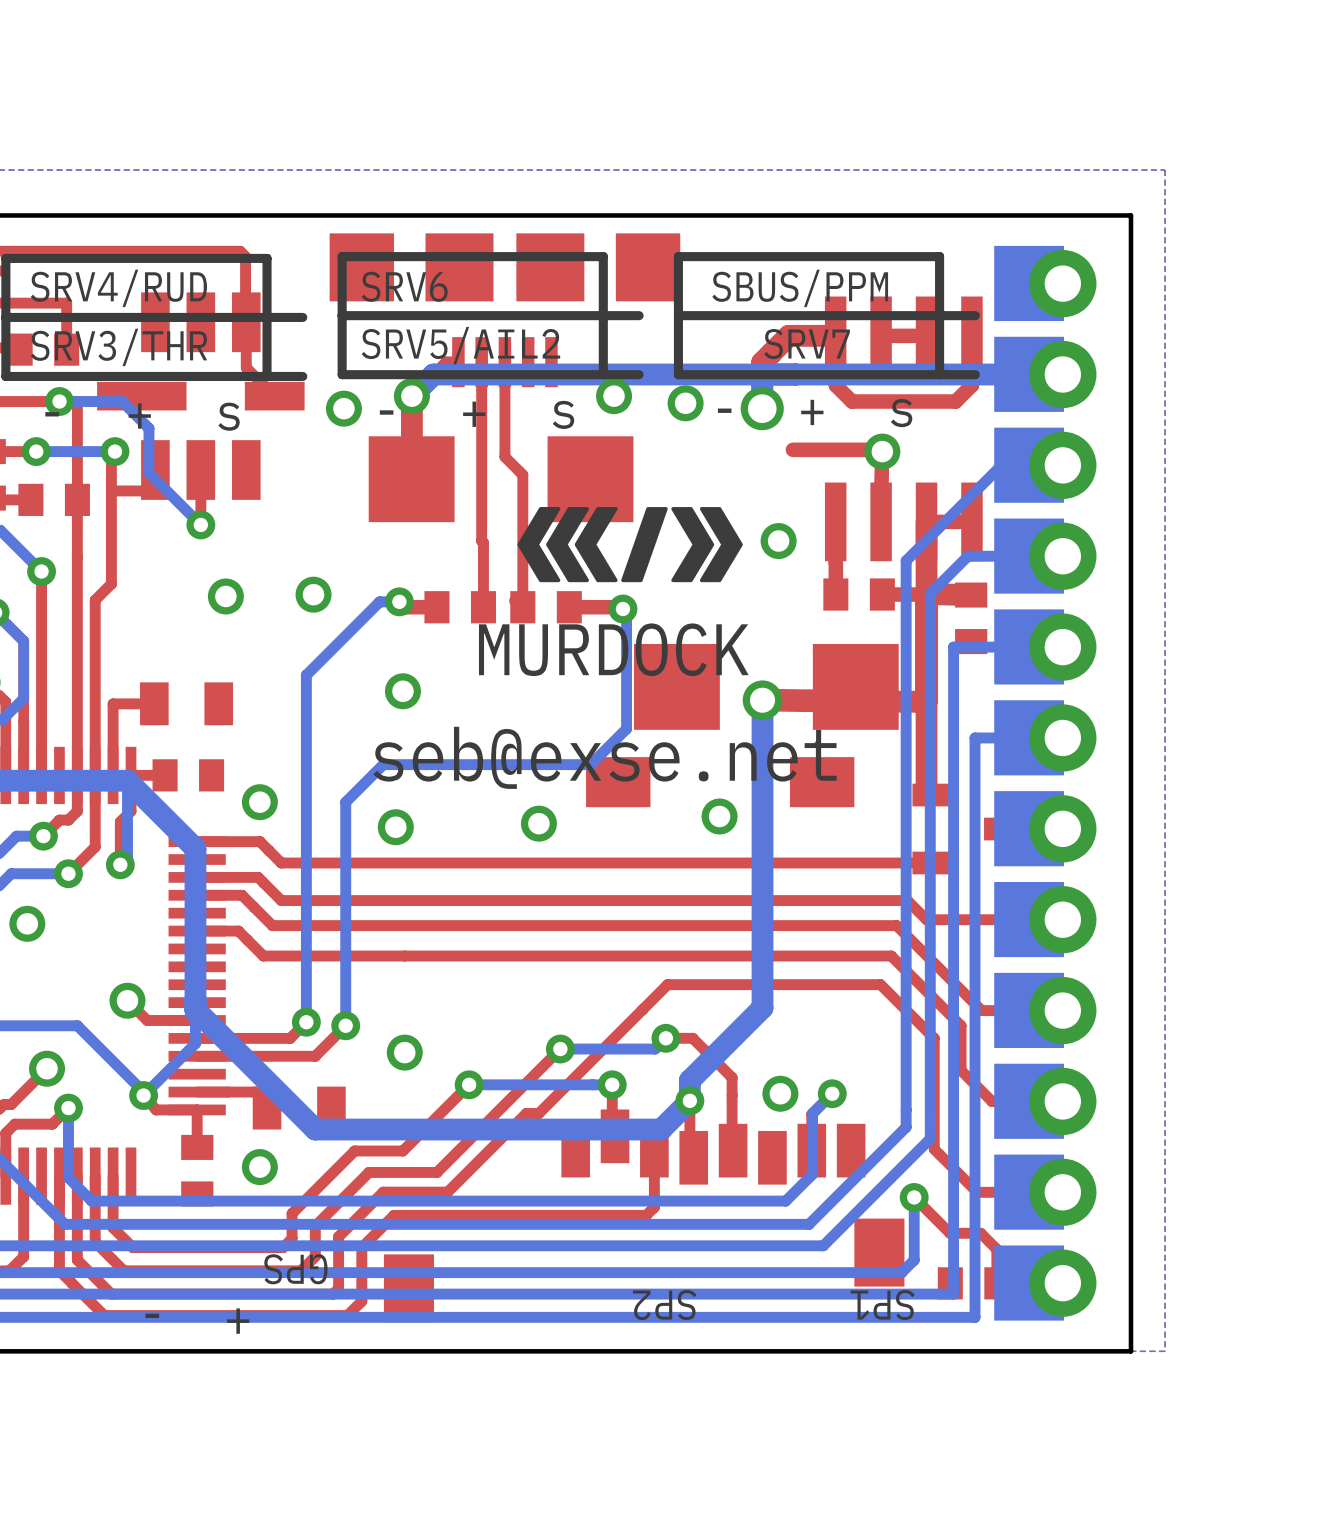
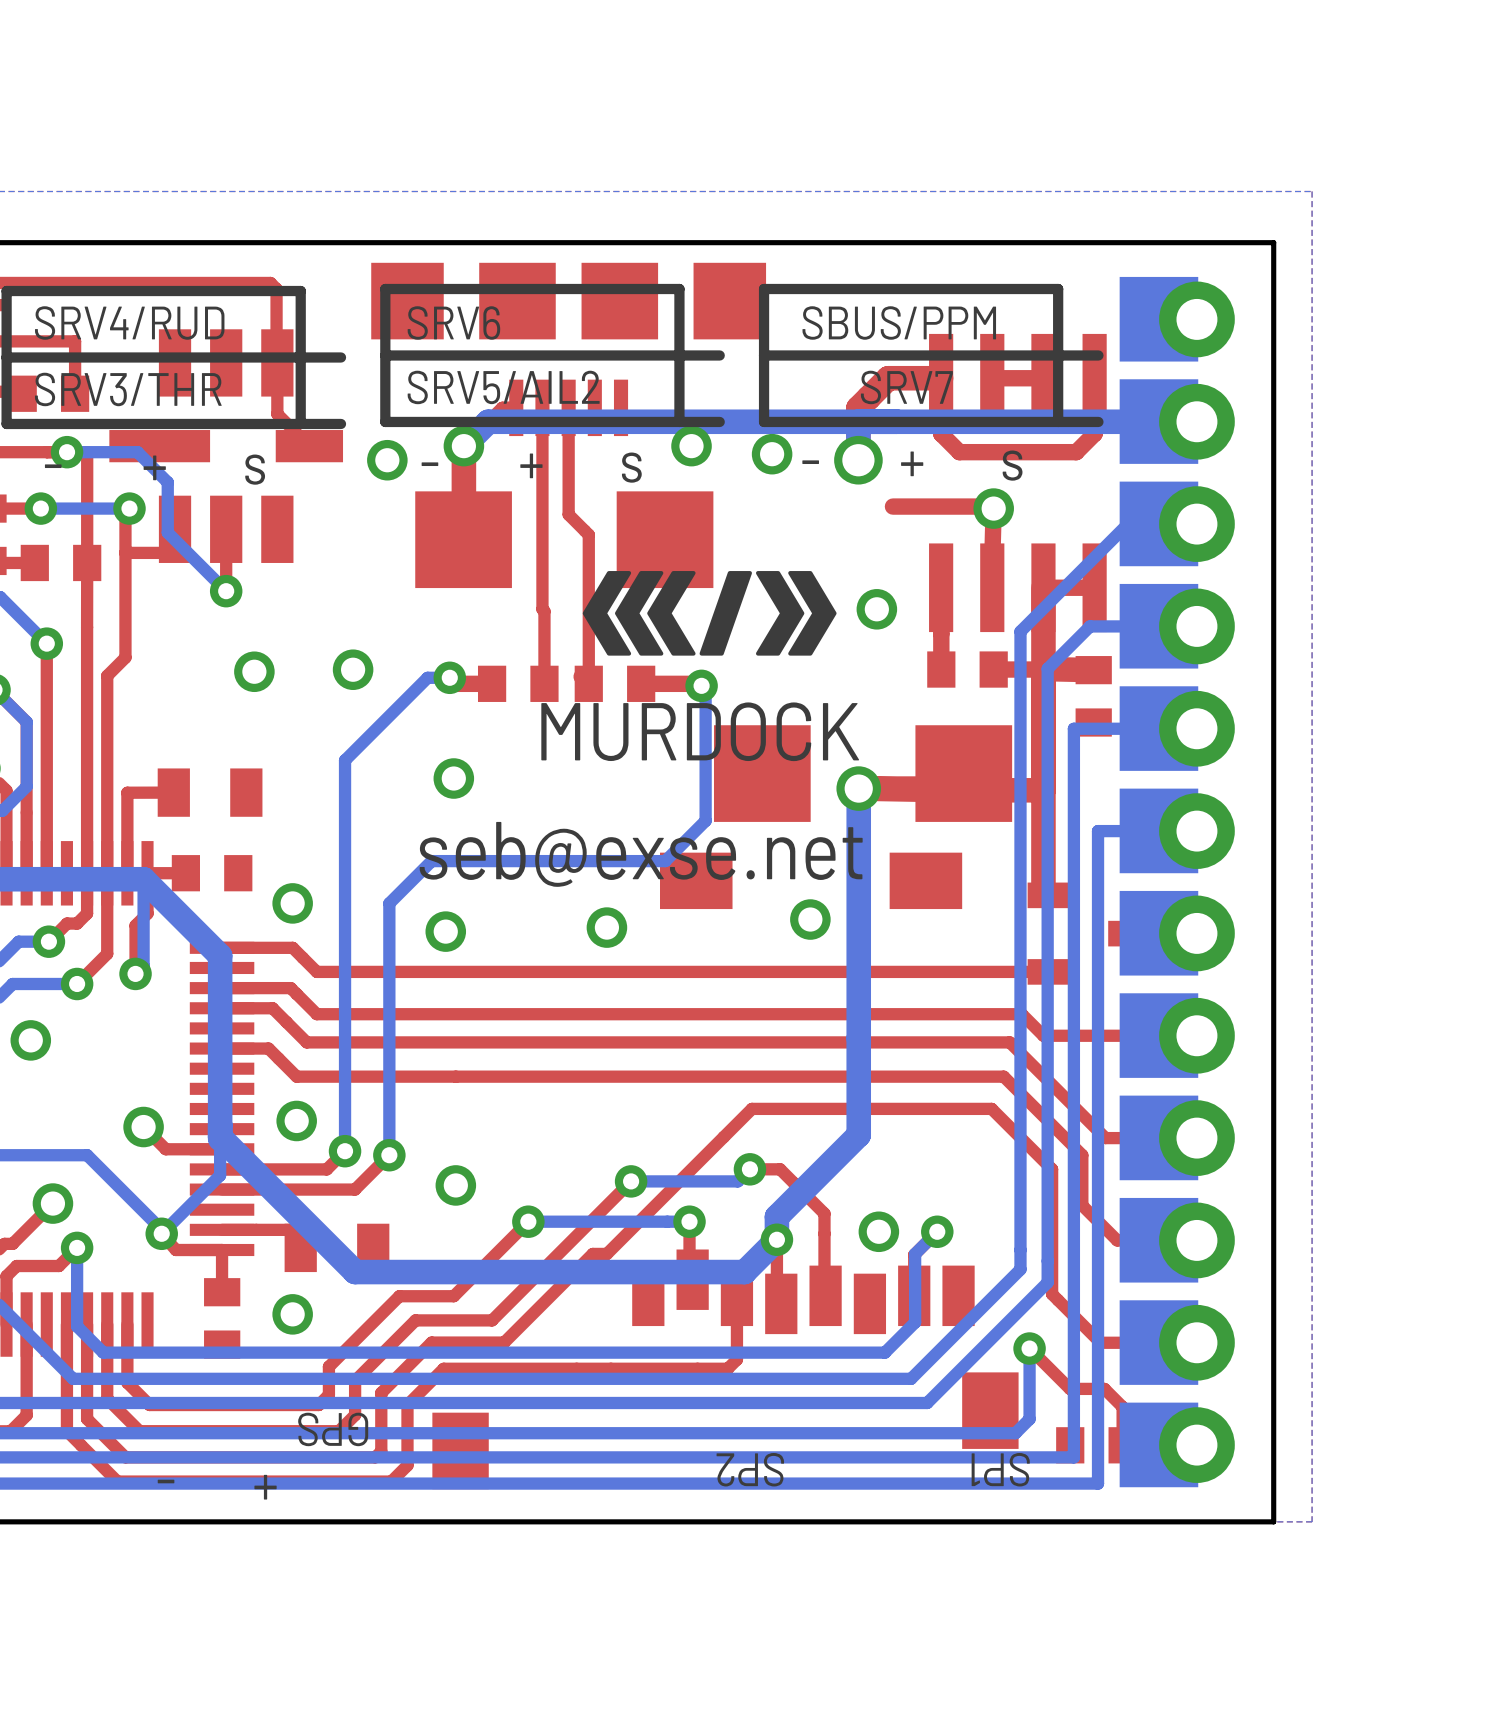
via: none -> (296, 1120)

